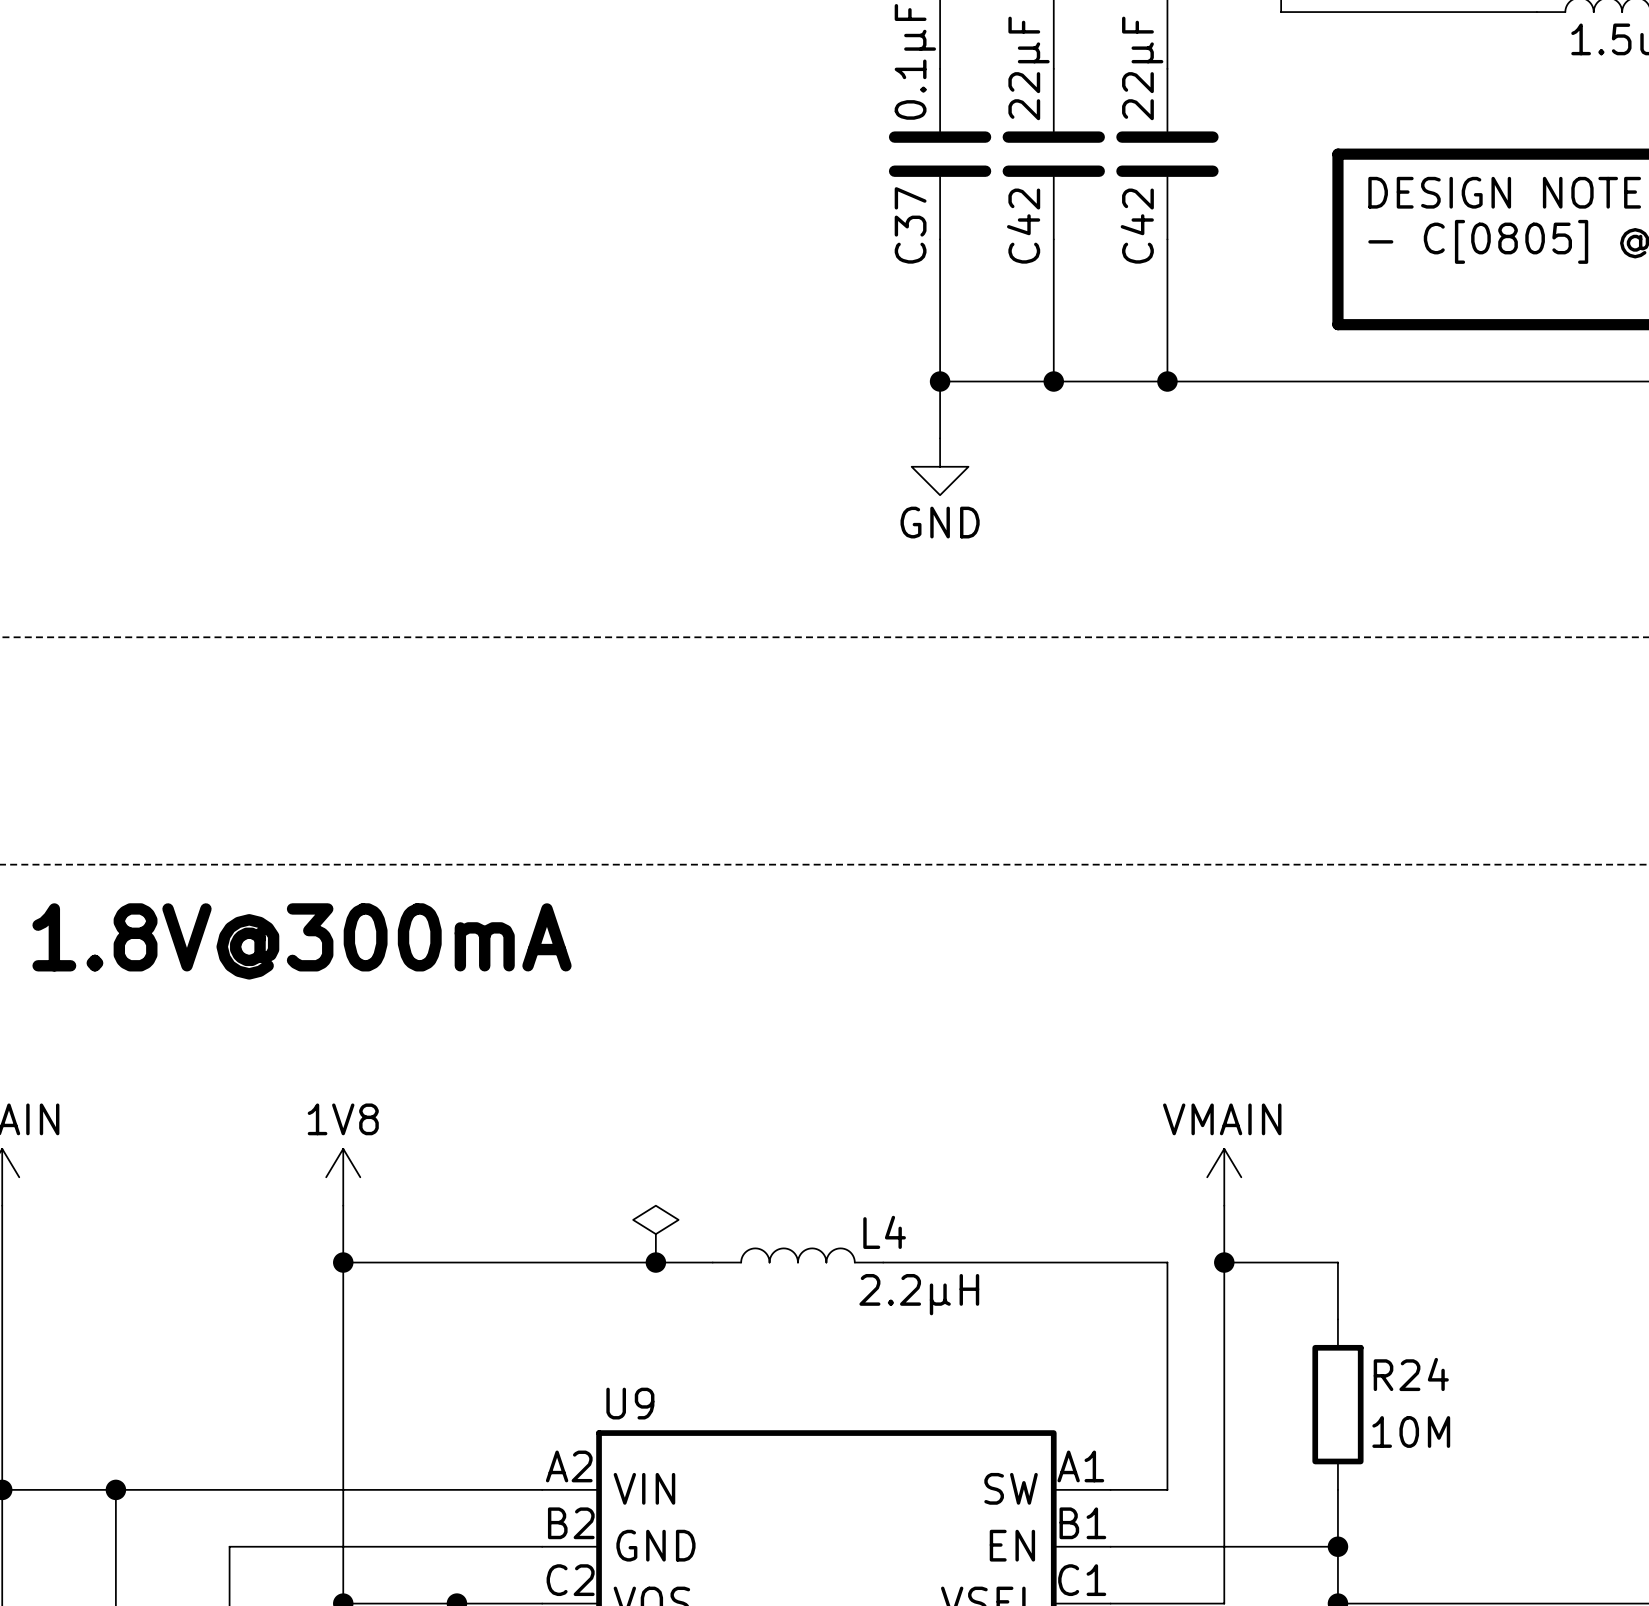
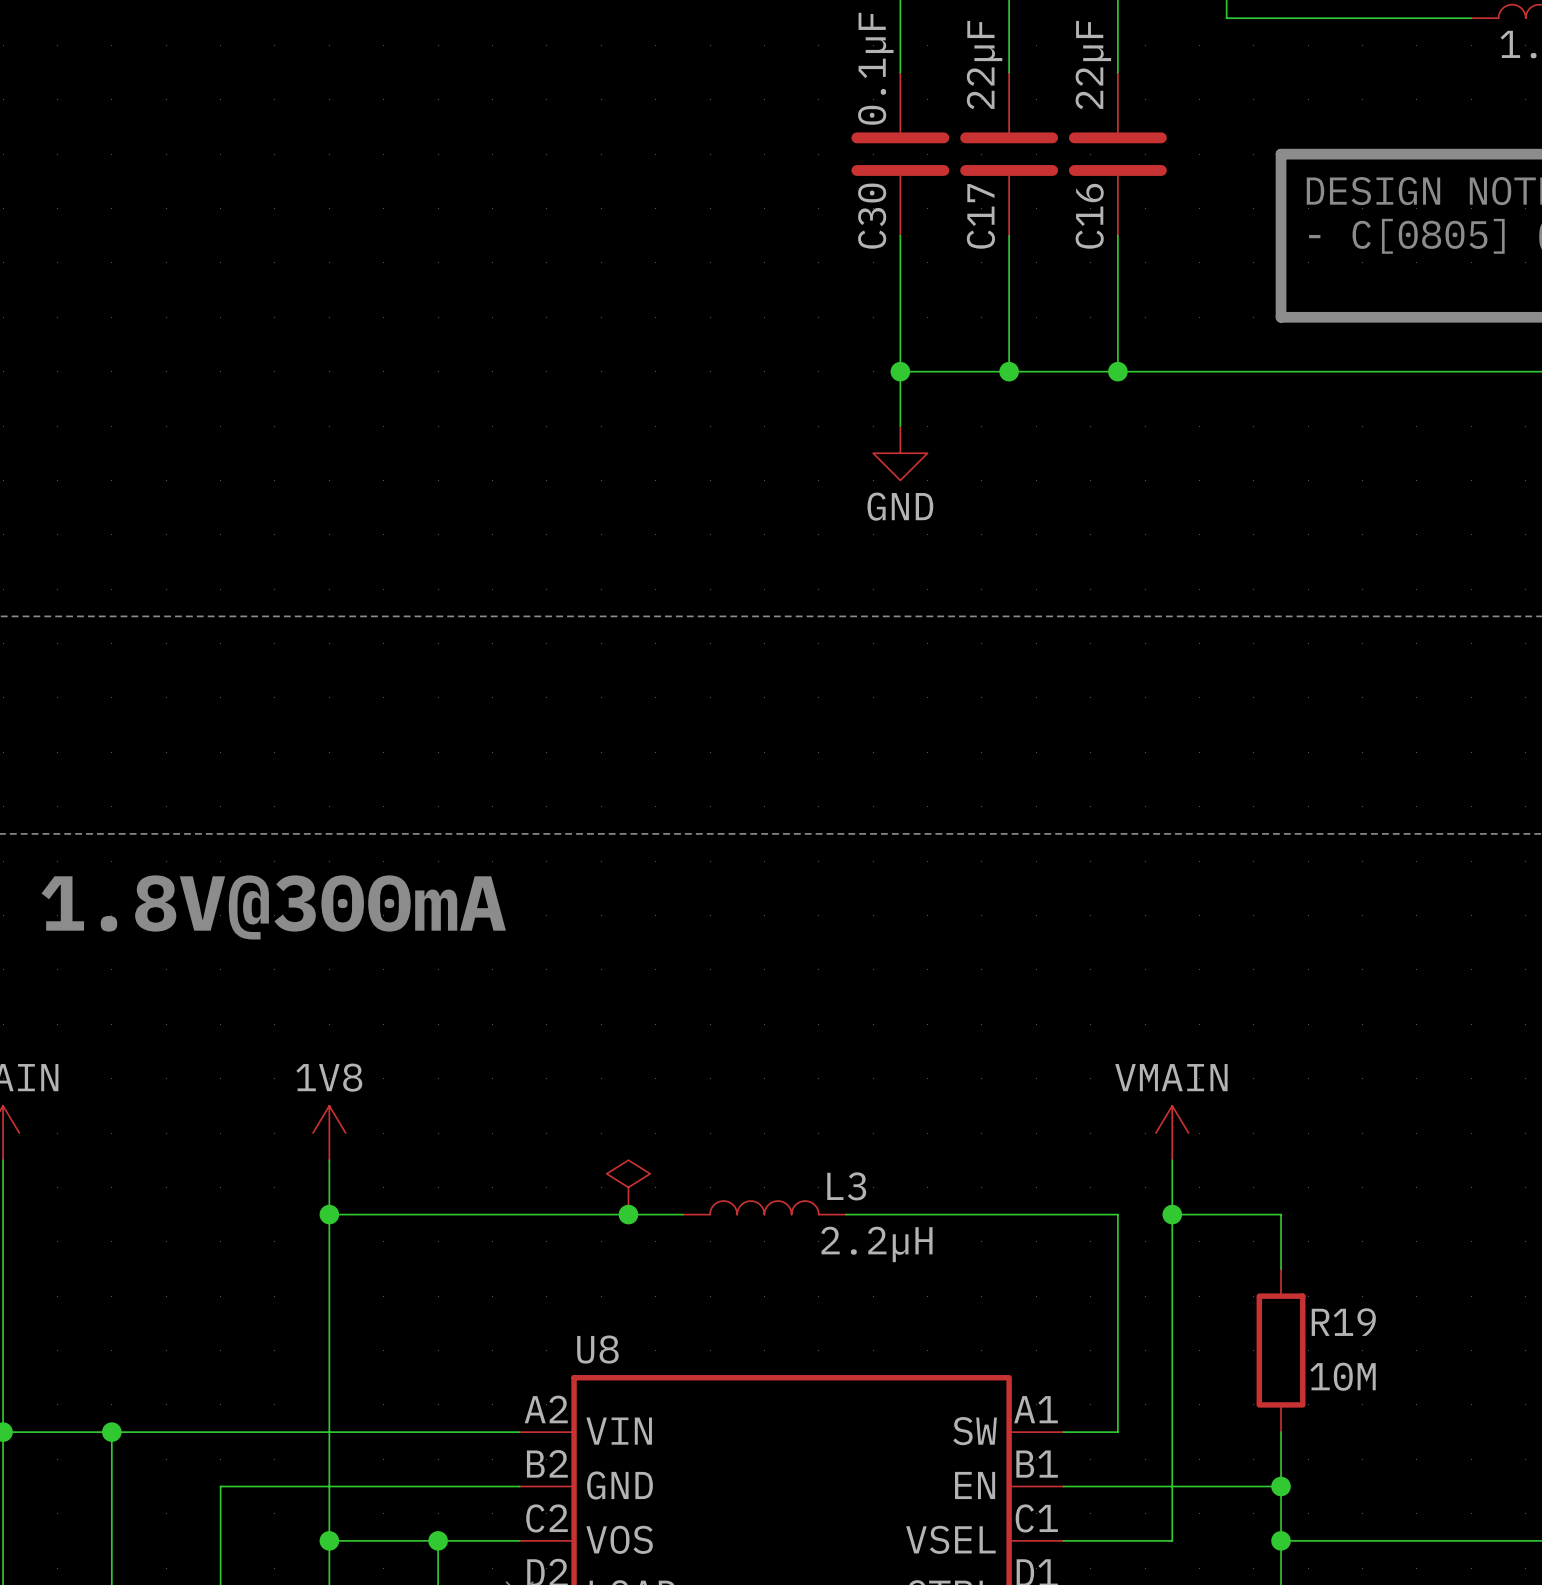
C37 name: C37 (910, 225) -> C30 (872, 216)
C42 name: C42 (1023, 226) -> C17 (980, 216)
C42 name: C42 (1137, 226) -> C16 (1089, 216)
L4 name: L4 (884, 1232) -> L3 (846, 1186)
R24 name: R24 (1411, 1374) -> R19 (1343, 1322)
U9 name: U9 (630, 1403) -> U8 (597, 1349)

